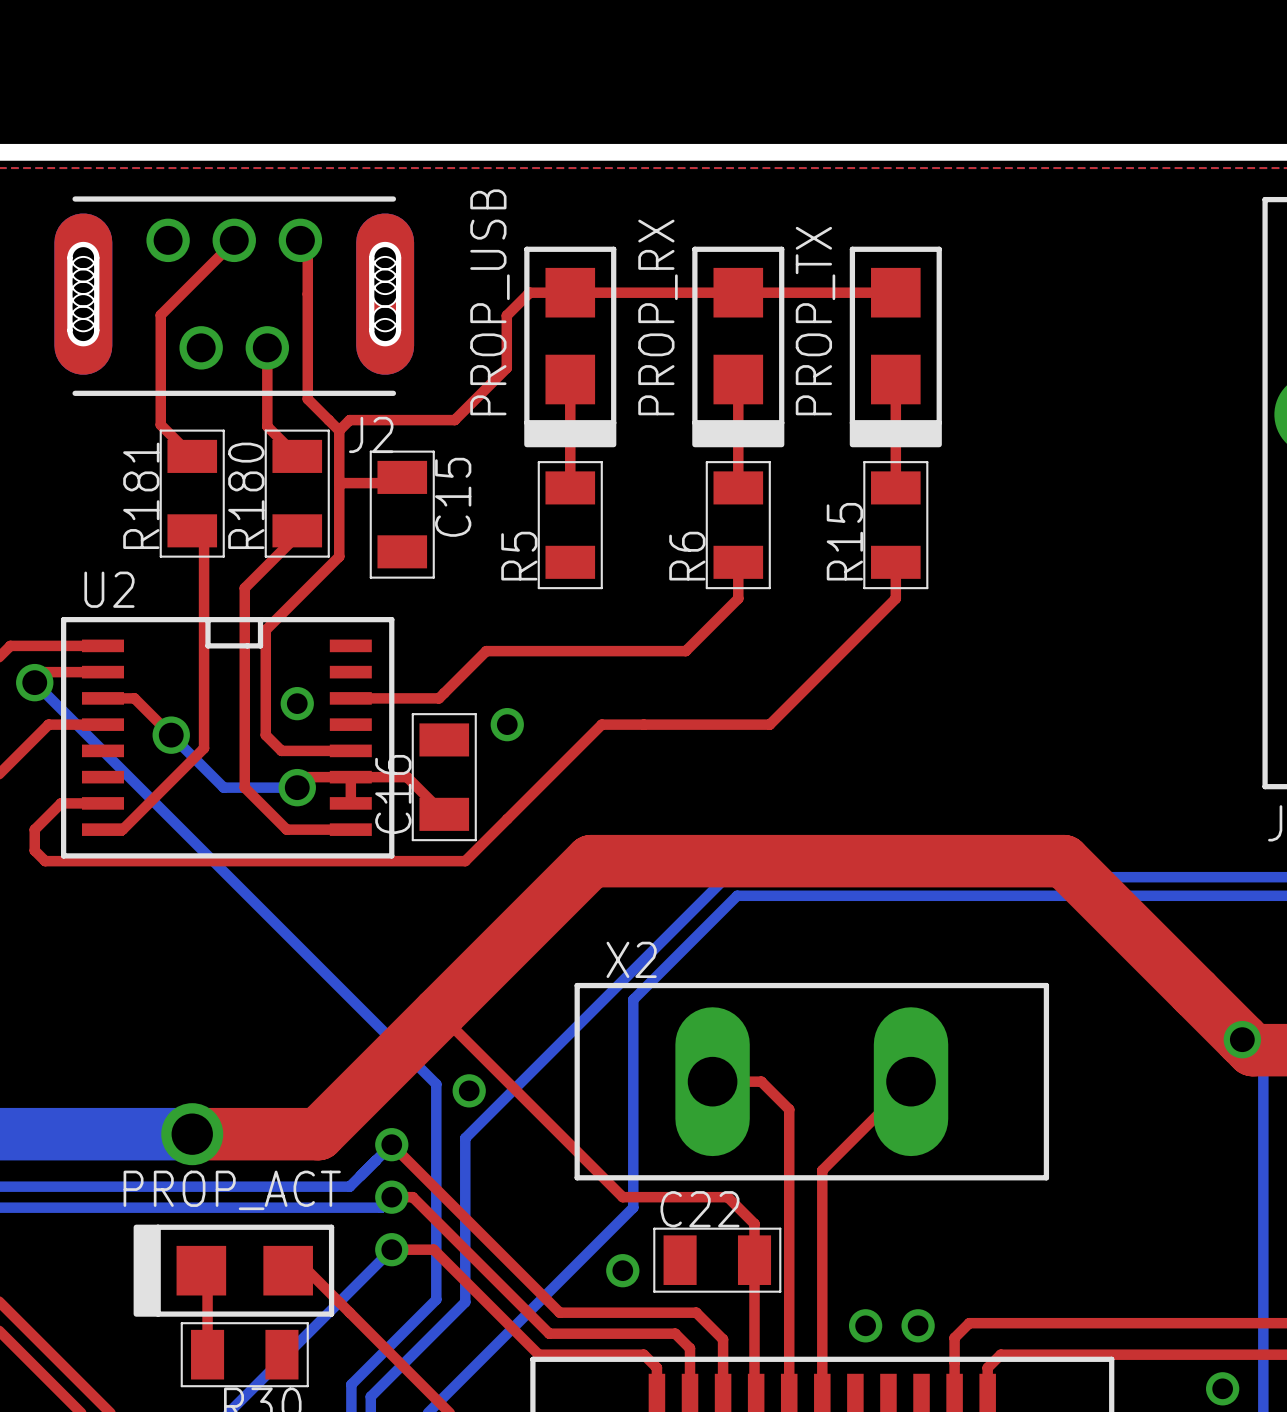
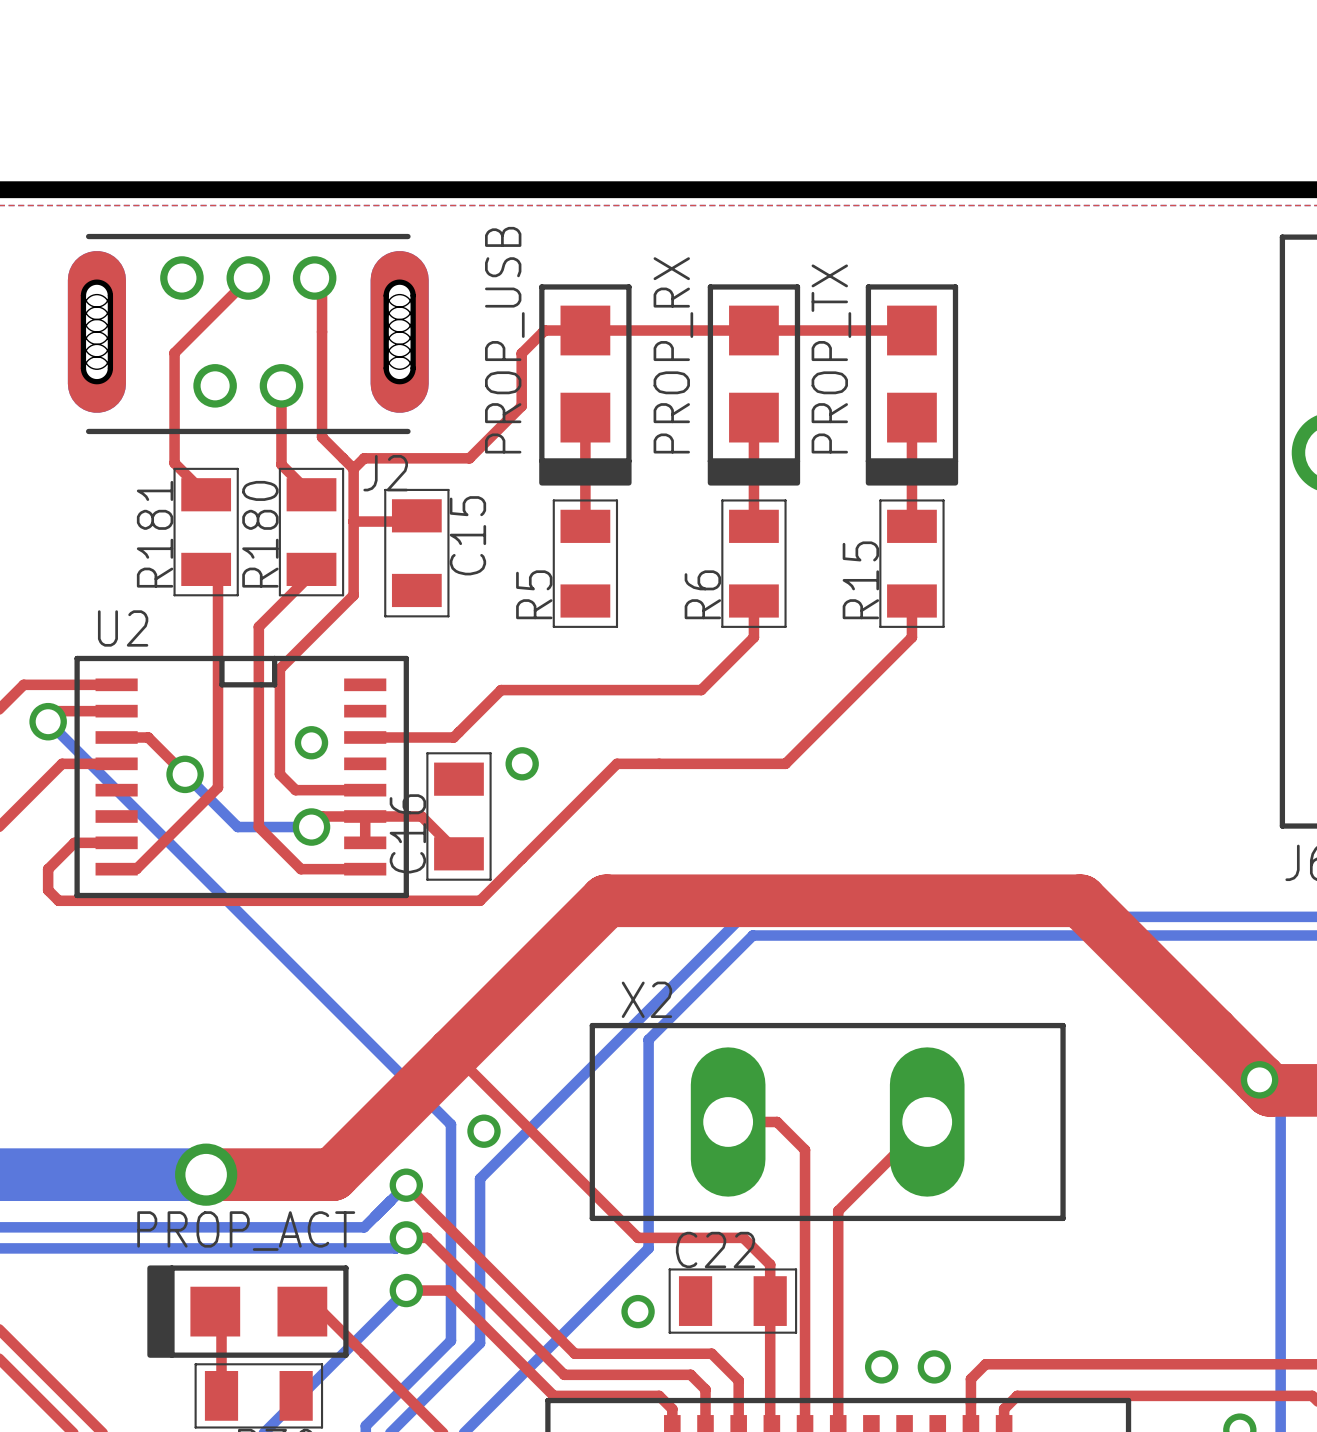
J2 footprint: [54, 196, 415, 396] -> [67, 233, 429, 435]

